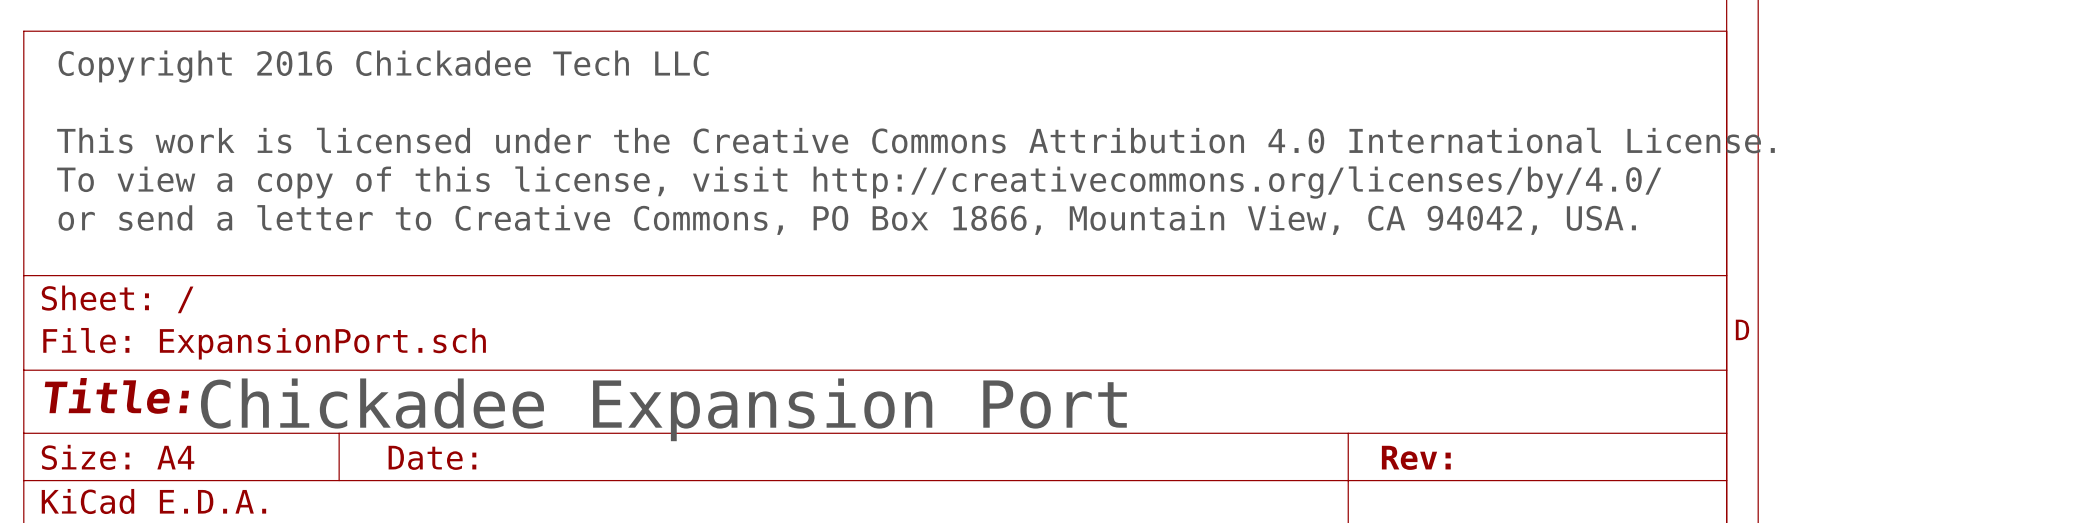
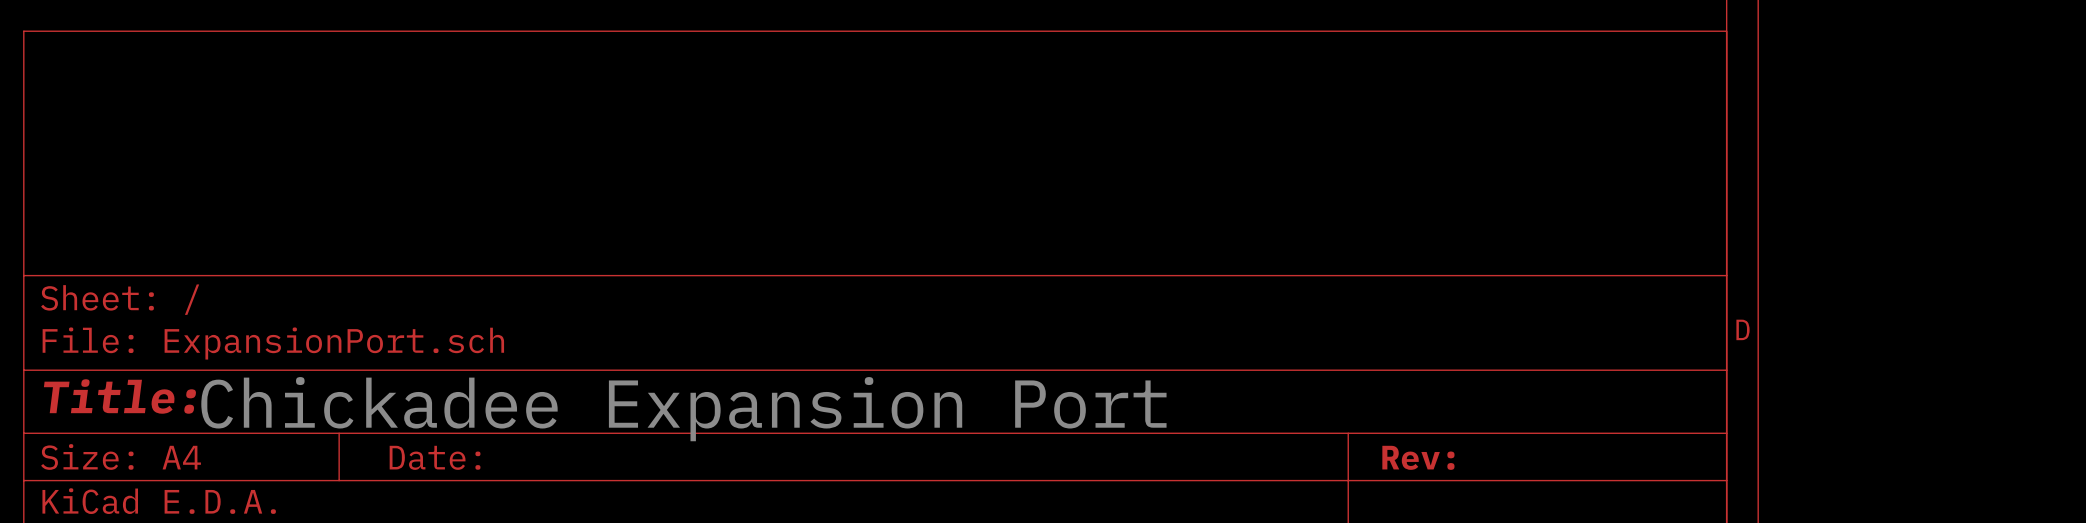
text: Copyright 2016 Chickadee Tech LLC (383, 66) -> none
text: This work is licensed under the Creative Commons Attribution 4.0 International License. (915, 140) -> none
text: To view a copy of this license, visit http://creativecommons.org/licenses/by/4.0/ (859, 182) -> none
text: or send a letter to Creative Commons, PO Box 1866, Mountain View, CA 94042, USA. (847, 220) -> none

